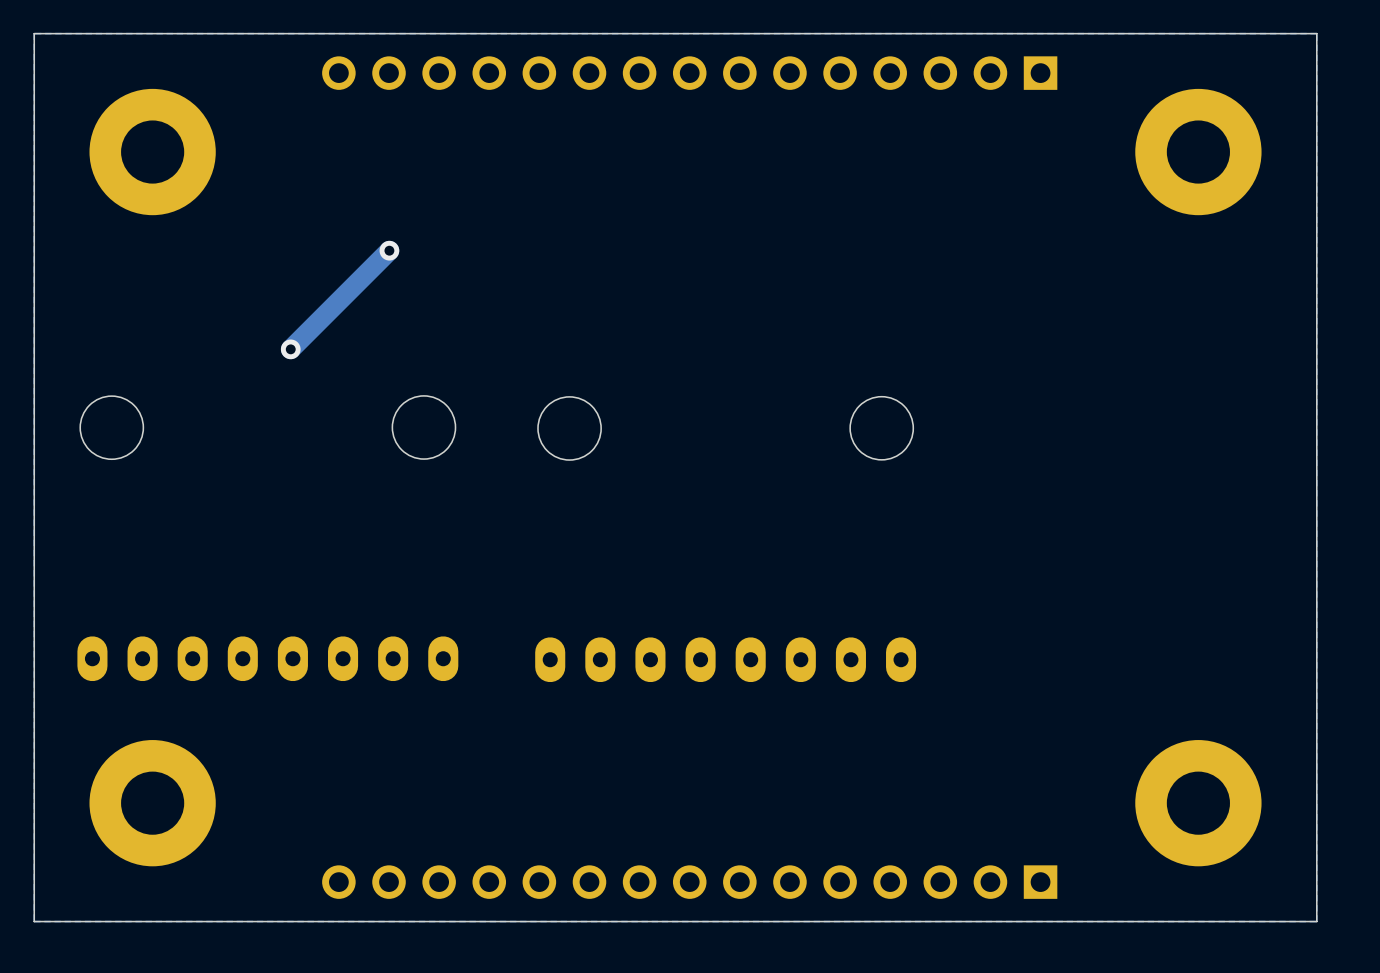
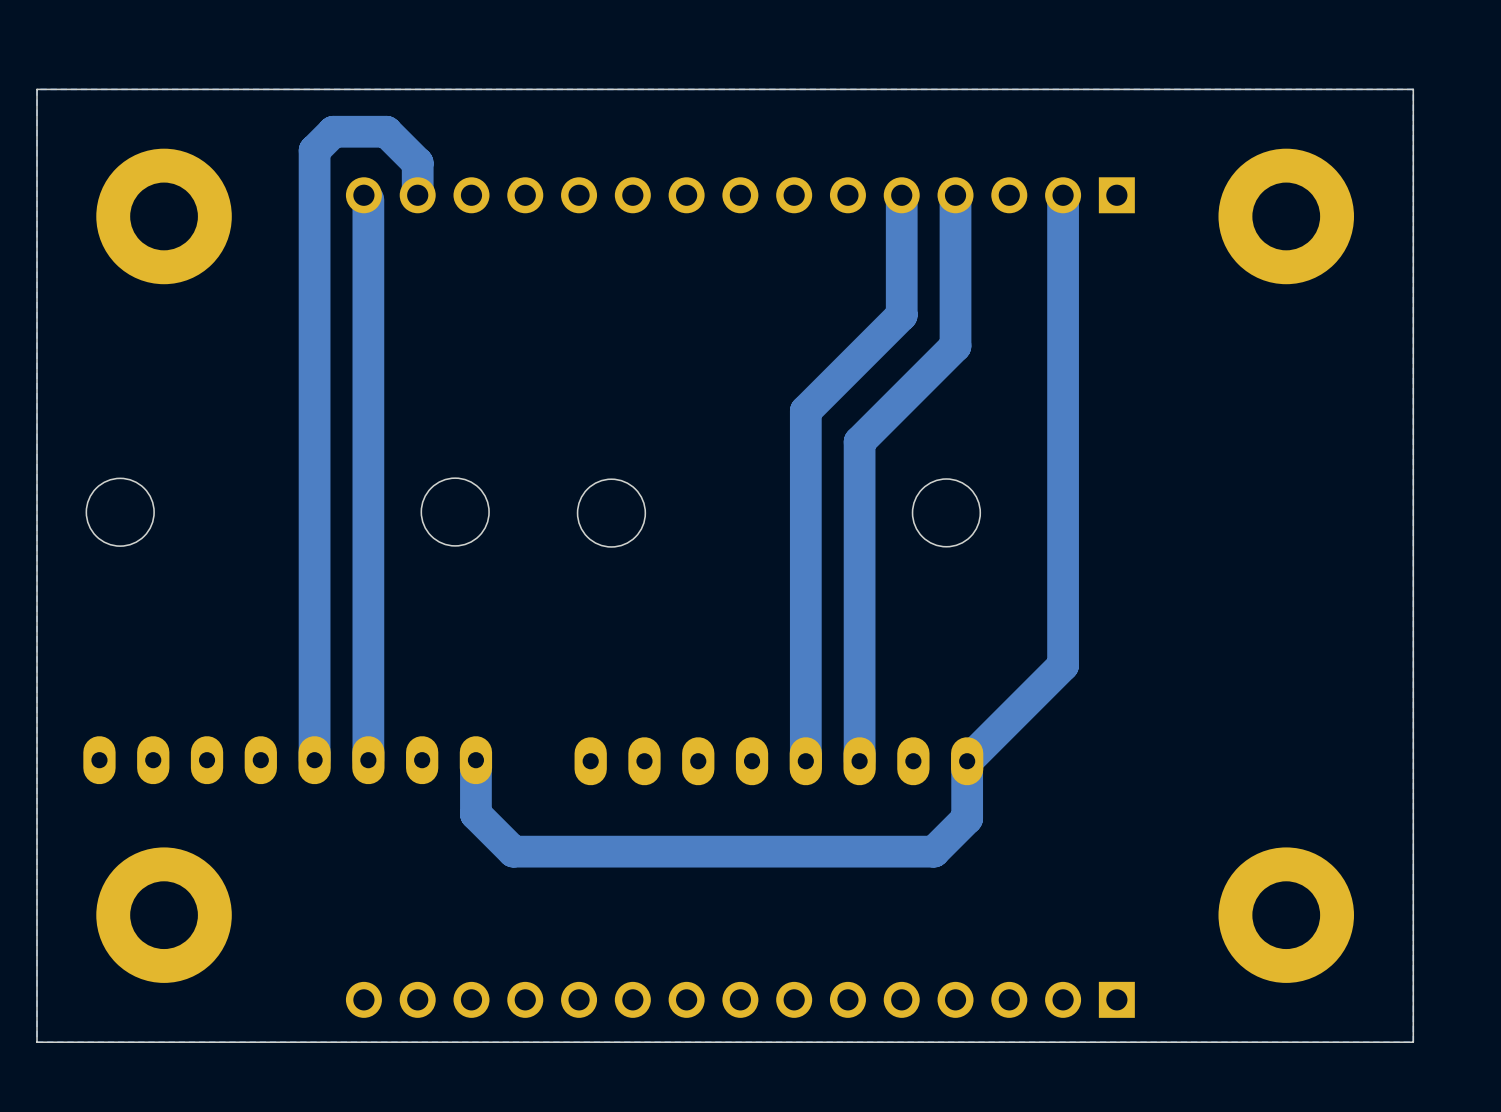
part position: (689, 73) -> (740, 195)
track: none -> (417, 195) (417, 163) (386, 131) (333, 131) (314, 150) (314, 760)
track: none -> (901, 195) (901, 315) (805, 411) (805, 761)
track: none -> (955, 195) (955, 346) (859, 441) (859, 761)
track: none -> (1063, 195) (1063, 665) (967, 761) (967, 818) (933, 851) (513, 851) (475, 814) (475, 760)
track: none -> (368, 199) (368, 760)
track: (389, 250) (290, 349) -> none
via: (389, 250) -> none
via: (290, 349) -> none

